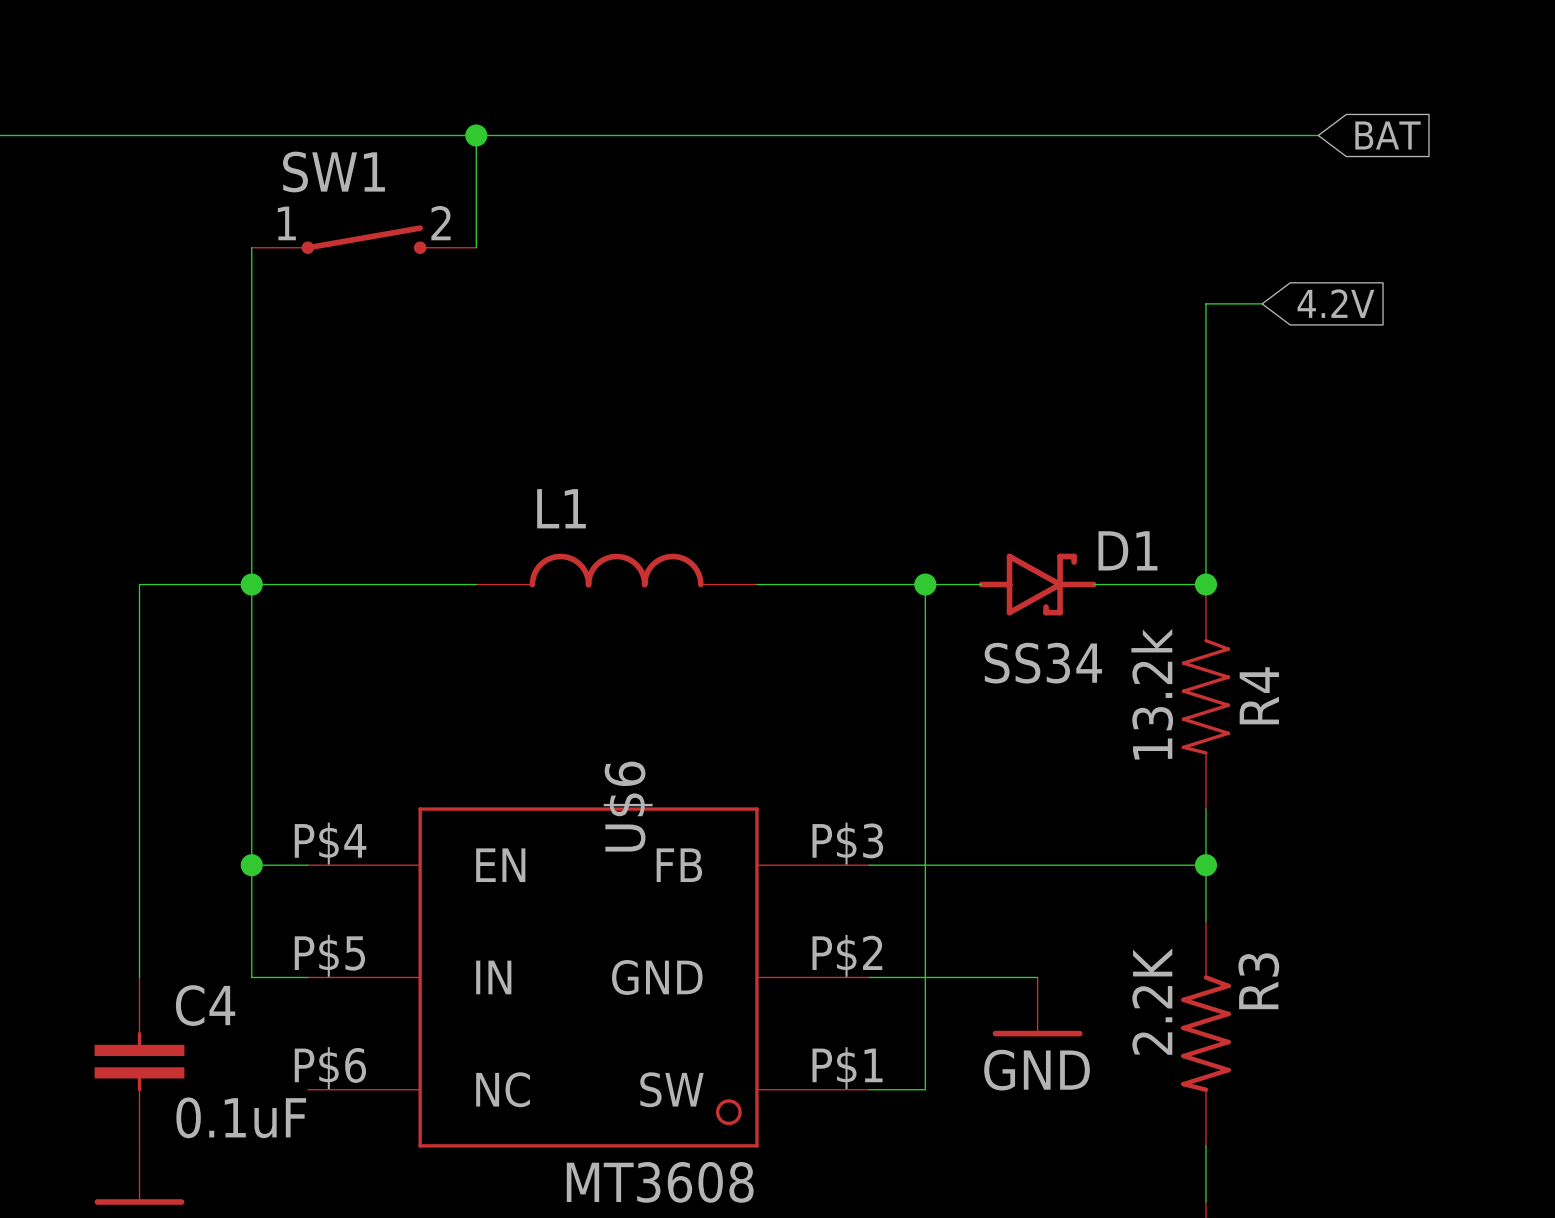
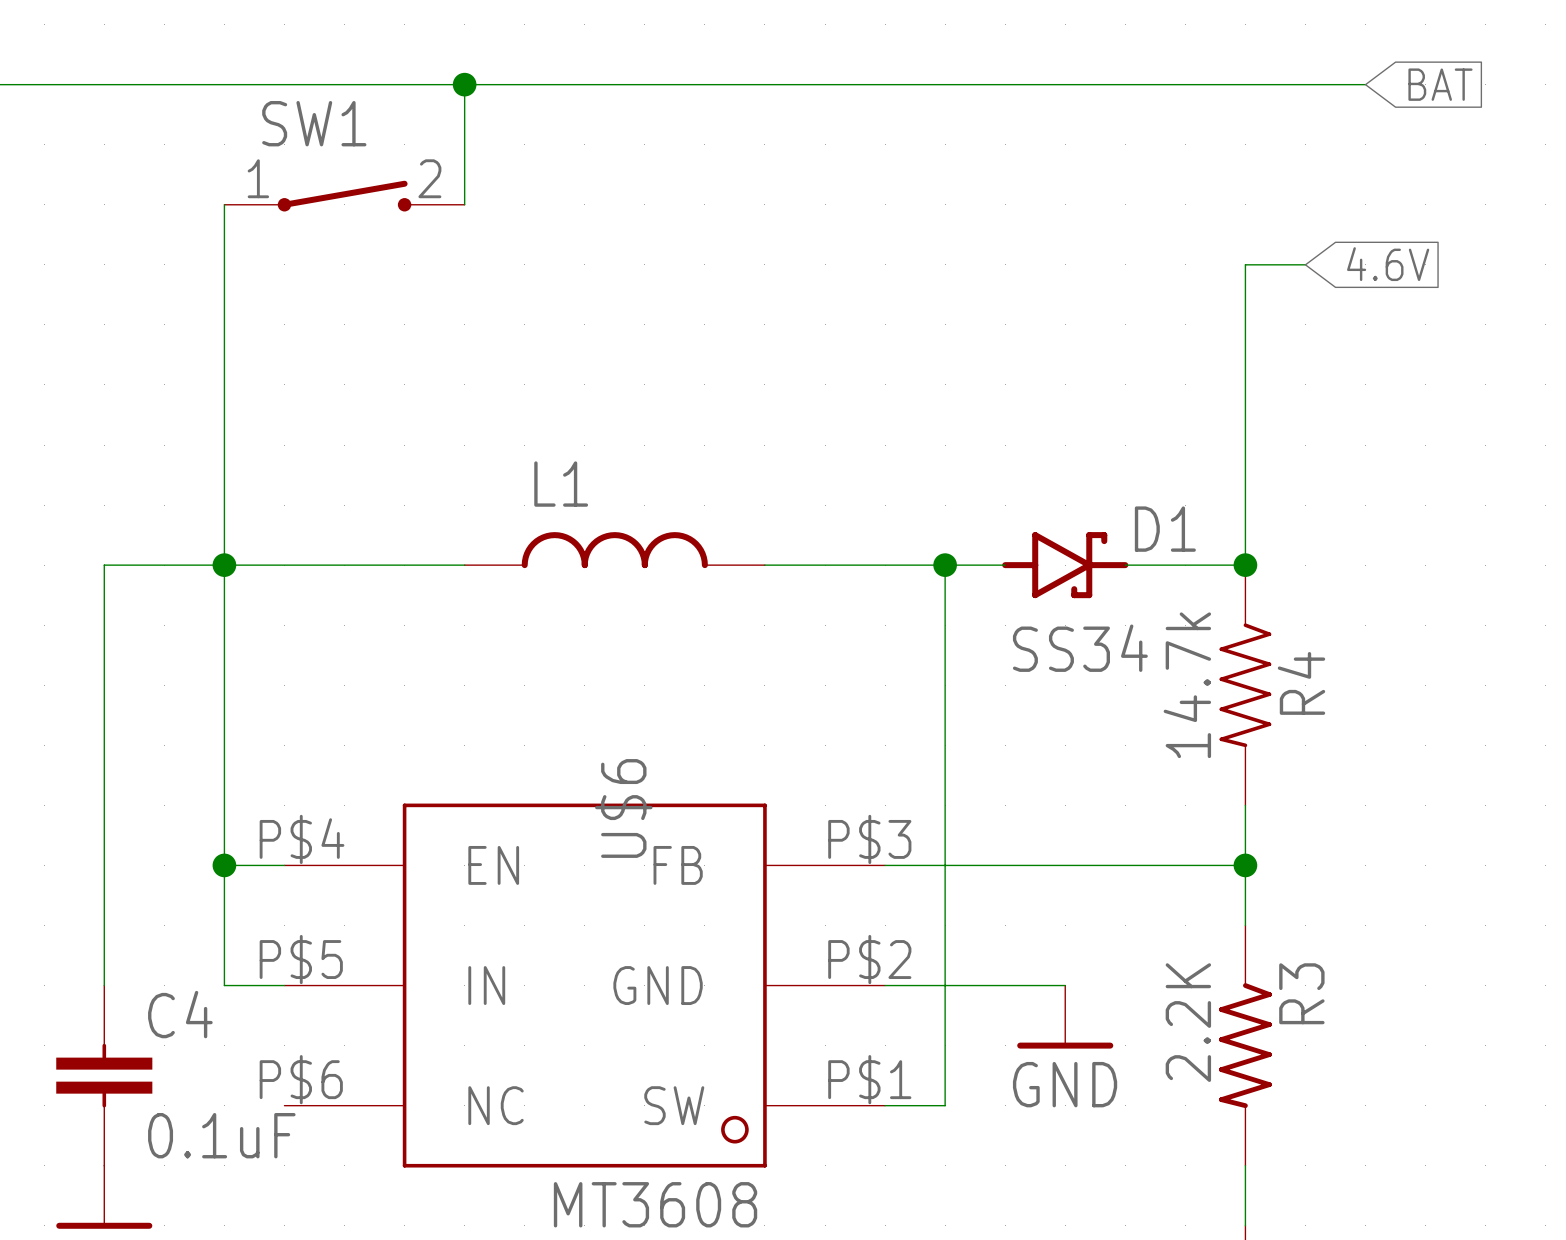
global label: 4.2V (1335, 303) -> 4.6V (1388, 264)
R4 value: 13.2k (1152, 694) -> 14.7k (1187, 685)

